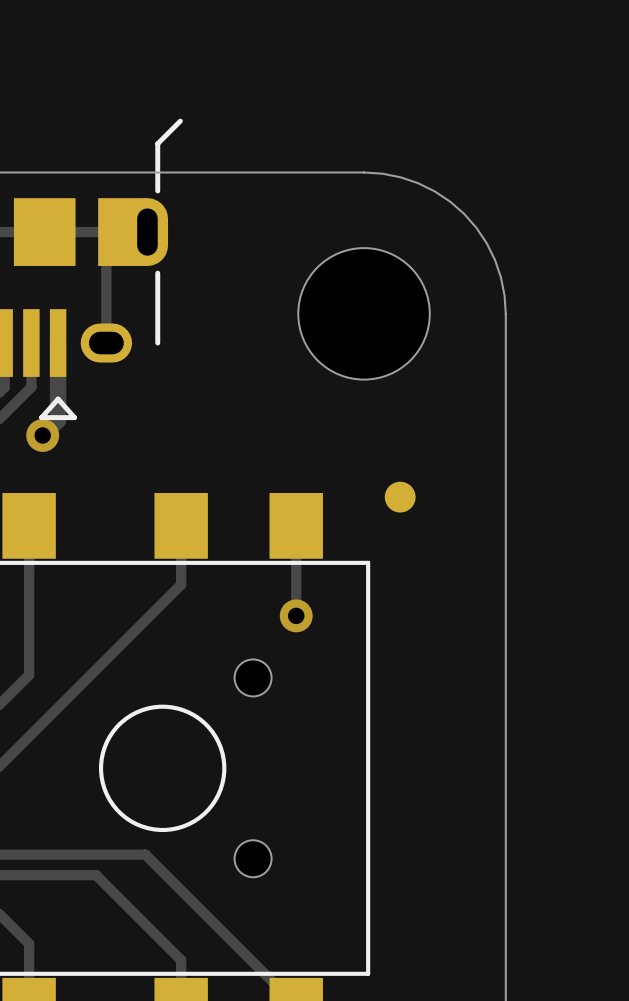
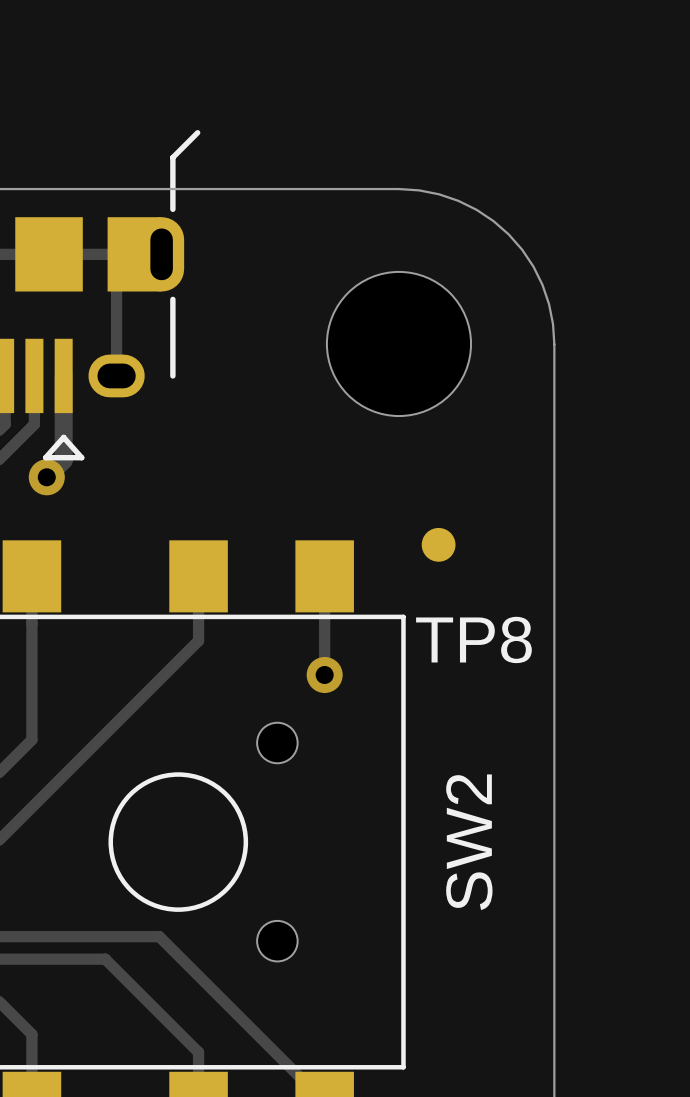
TP8 name: none -> TP8 (473, 639)
SW2 name: none -> SW2 (469, 842)

